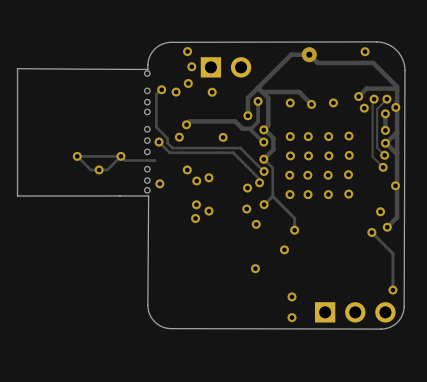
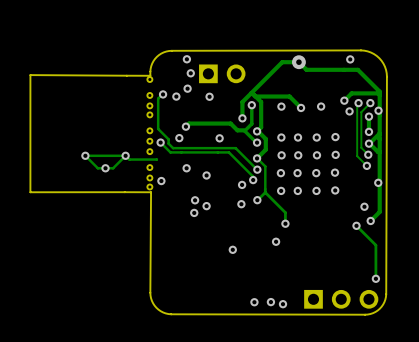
via: (196, 180) -> none
via: (256, 224) -> none
via: none -> (232, 249)
via: (255, 268) -> none
via: (291, 296) -> none
via: none -> (254, 302)
via: none -> (270, 302)

